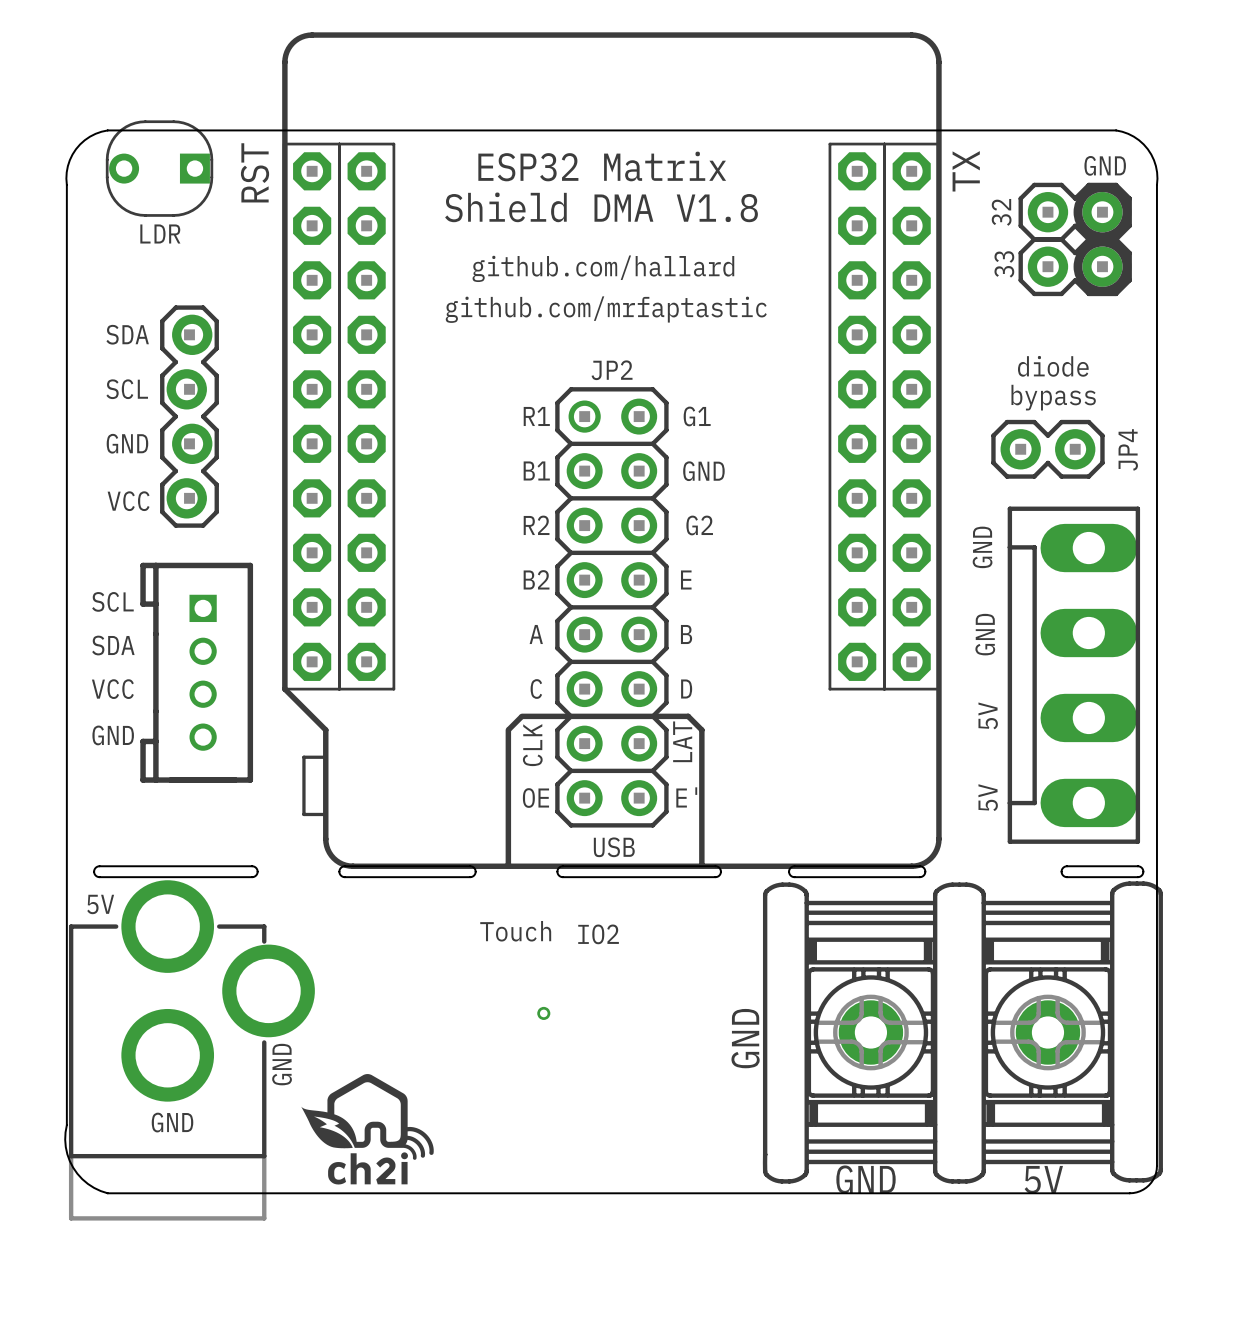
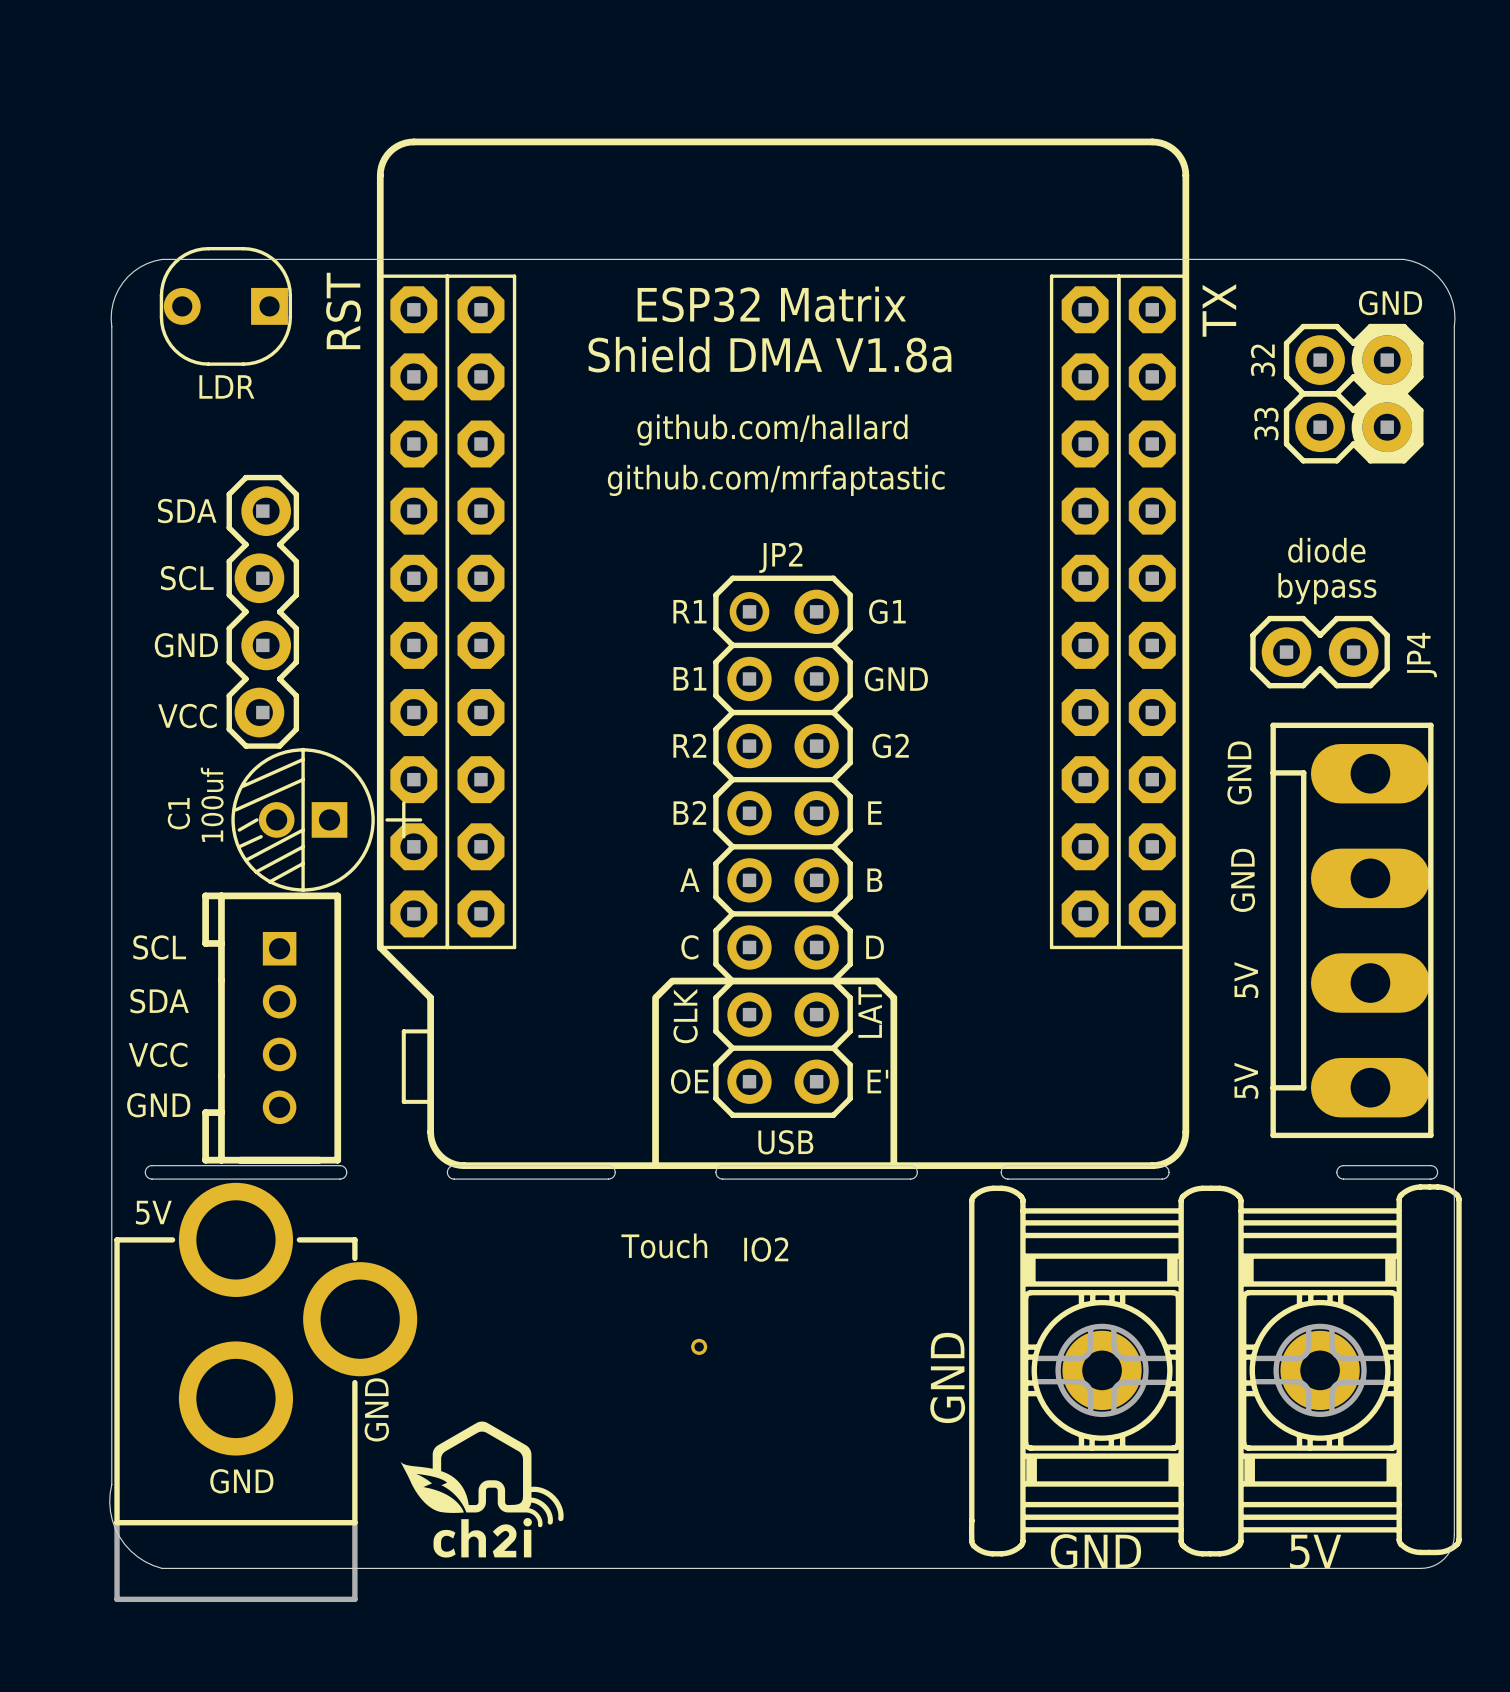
text: Shield DMA V1.8 (601, 207) -> Shield DMA V1.8a (769, 354)
C1: none -> 100uf (326, 819)
text: SCL (112, 601) -> none
text: SDA (113, 645) -> none
part position: (196, 672) -> (271, 1028)
text: VCC (112, 689) -> SCL (159, 947)
text: GND (113, 735) -> SDA (159, 1001)
text: none -> VCC (158, 1054)
text: none -> GND (158, 1105)

